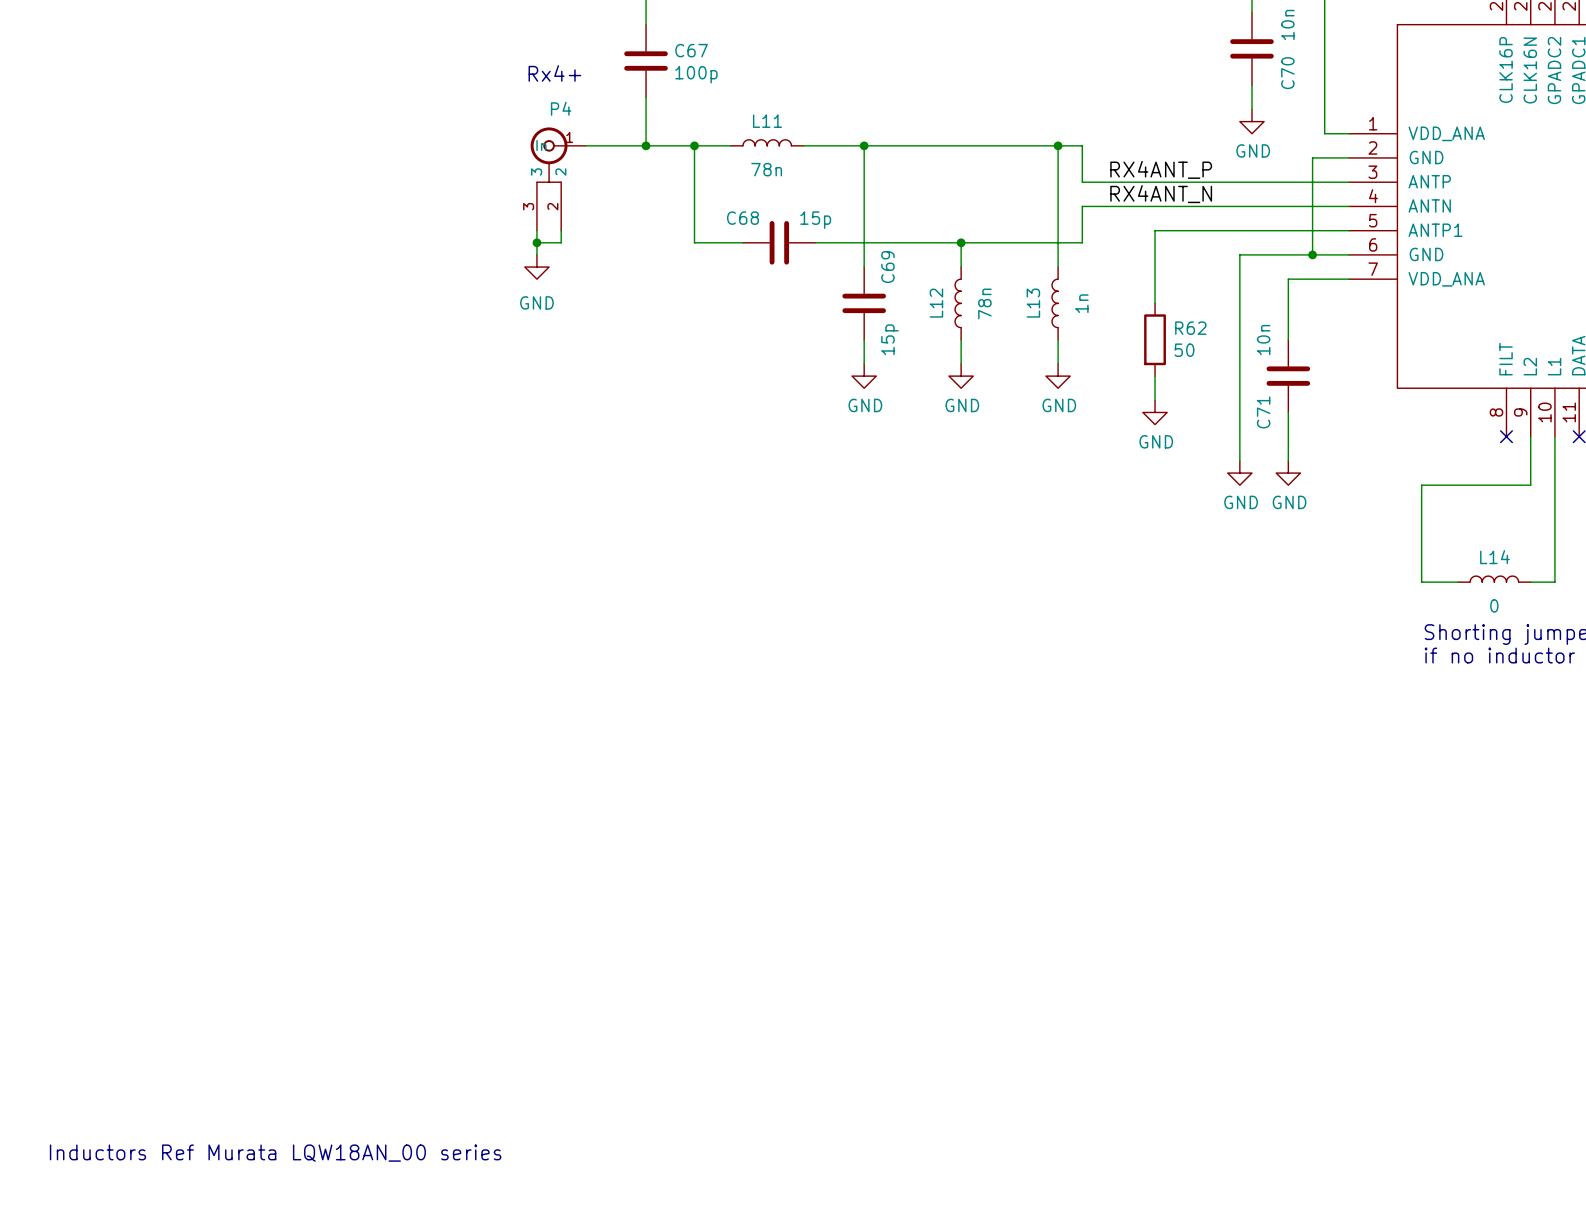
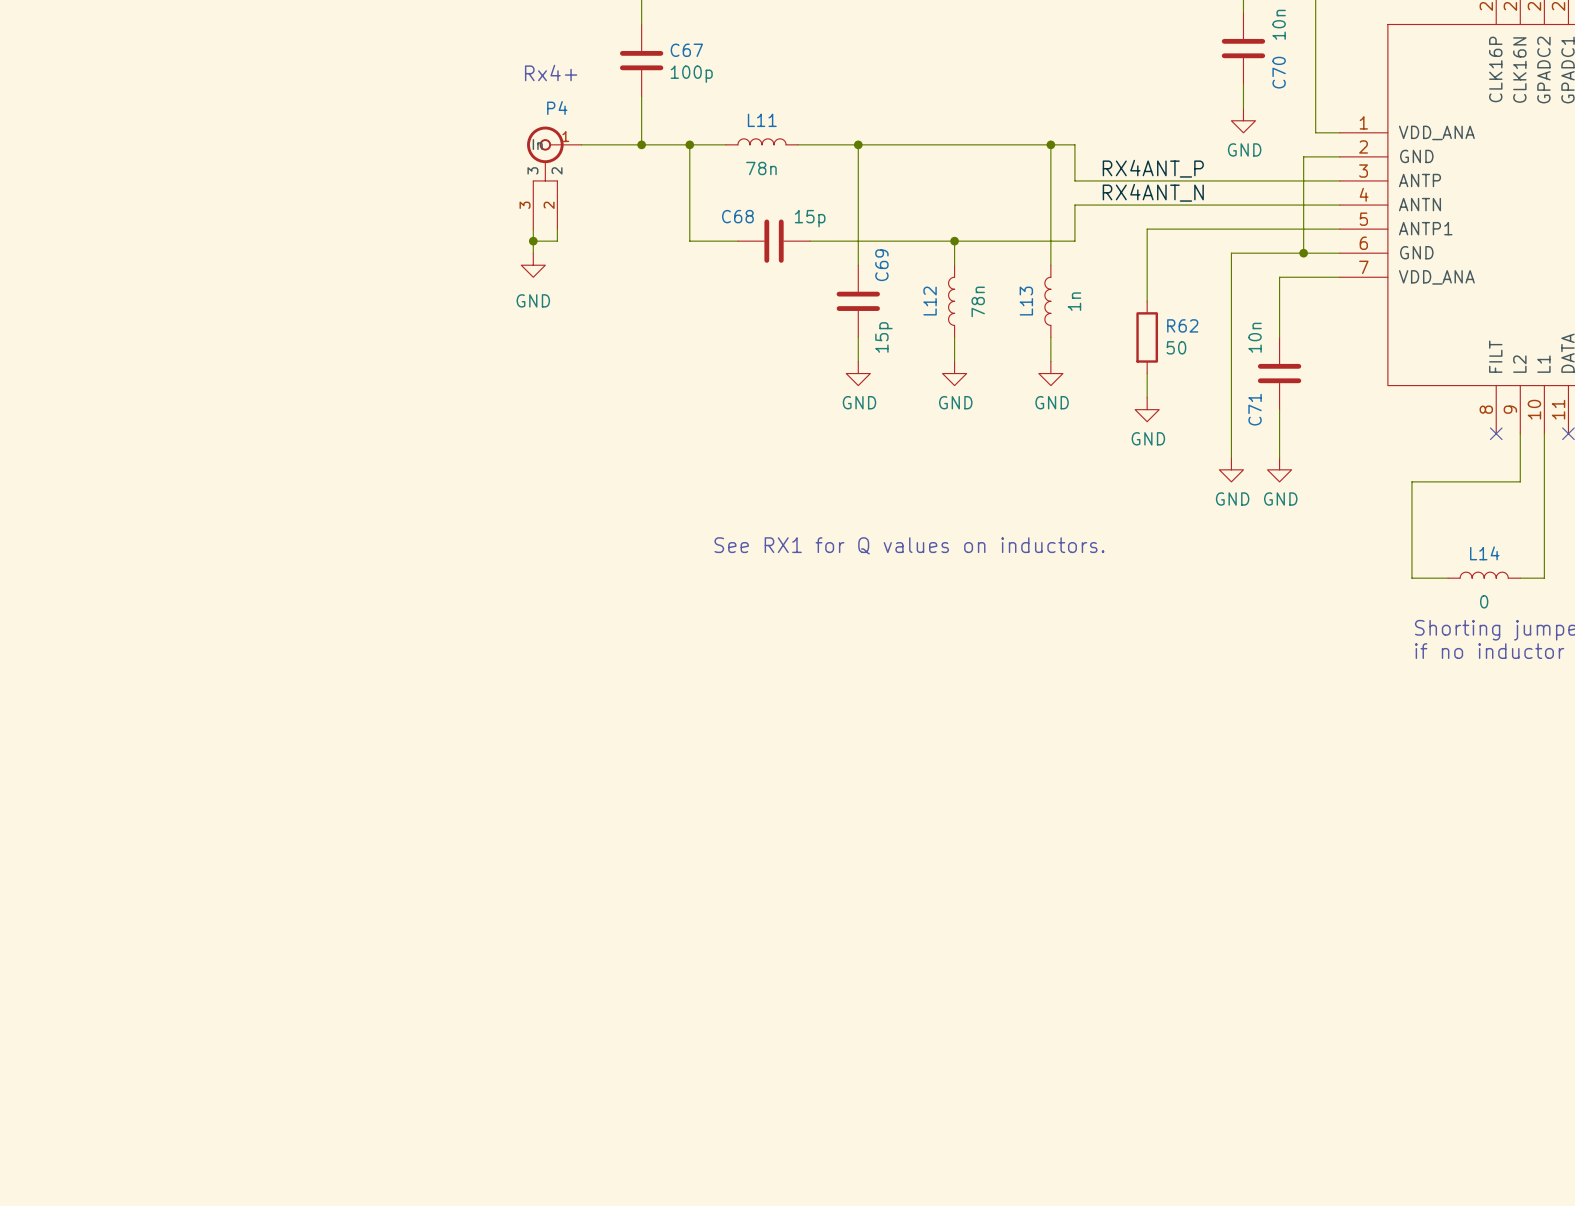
text: none -> See RX1 for Q values on inductors. (909, 545)
text: Inductors Ref Murata LQW18AN_00 series (275, 1153) -> none

